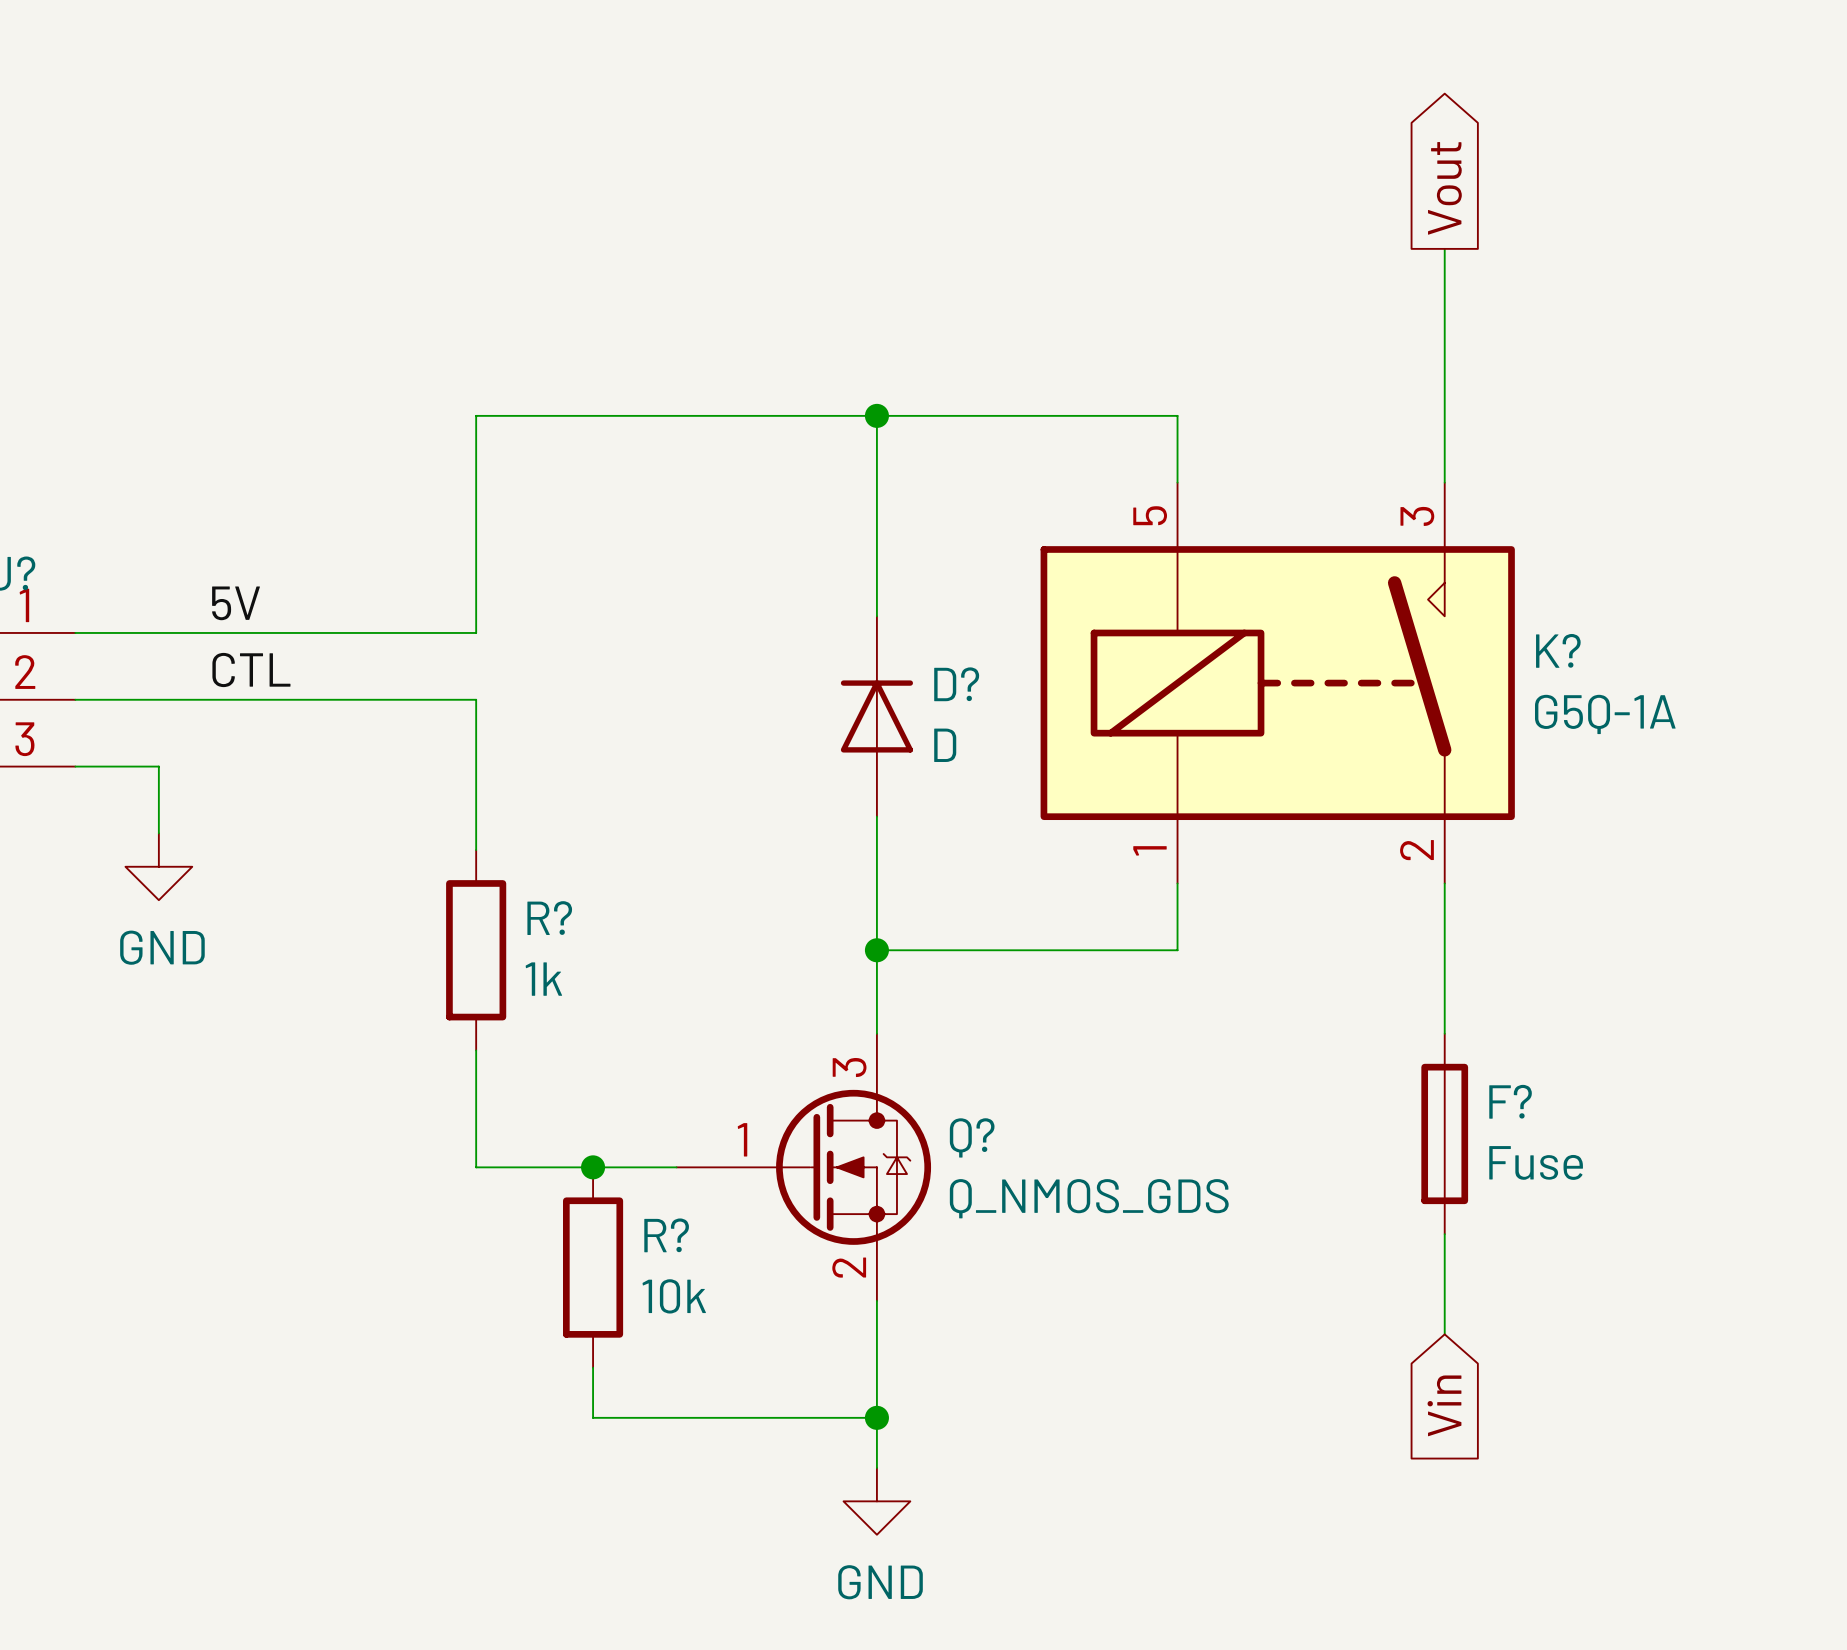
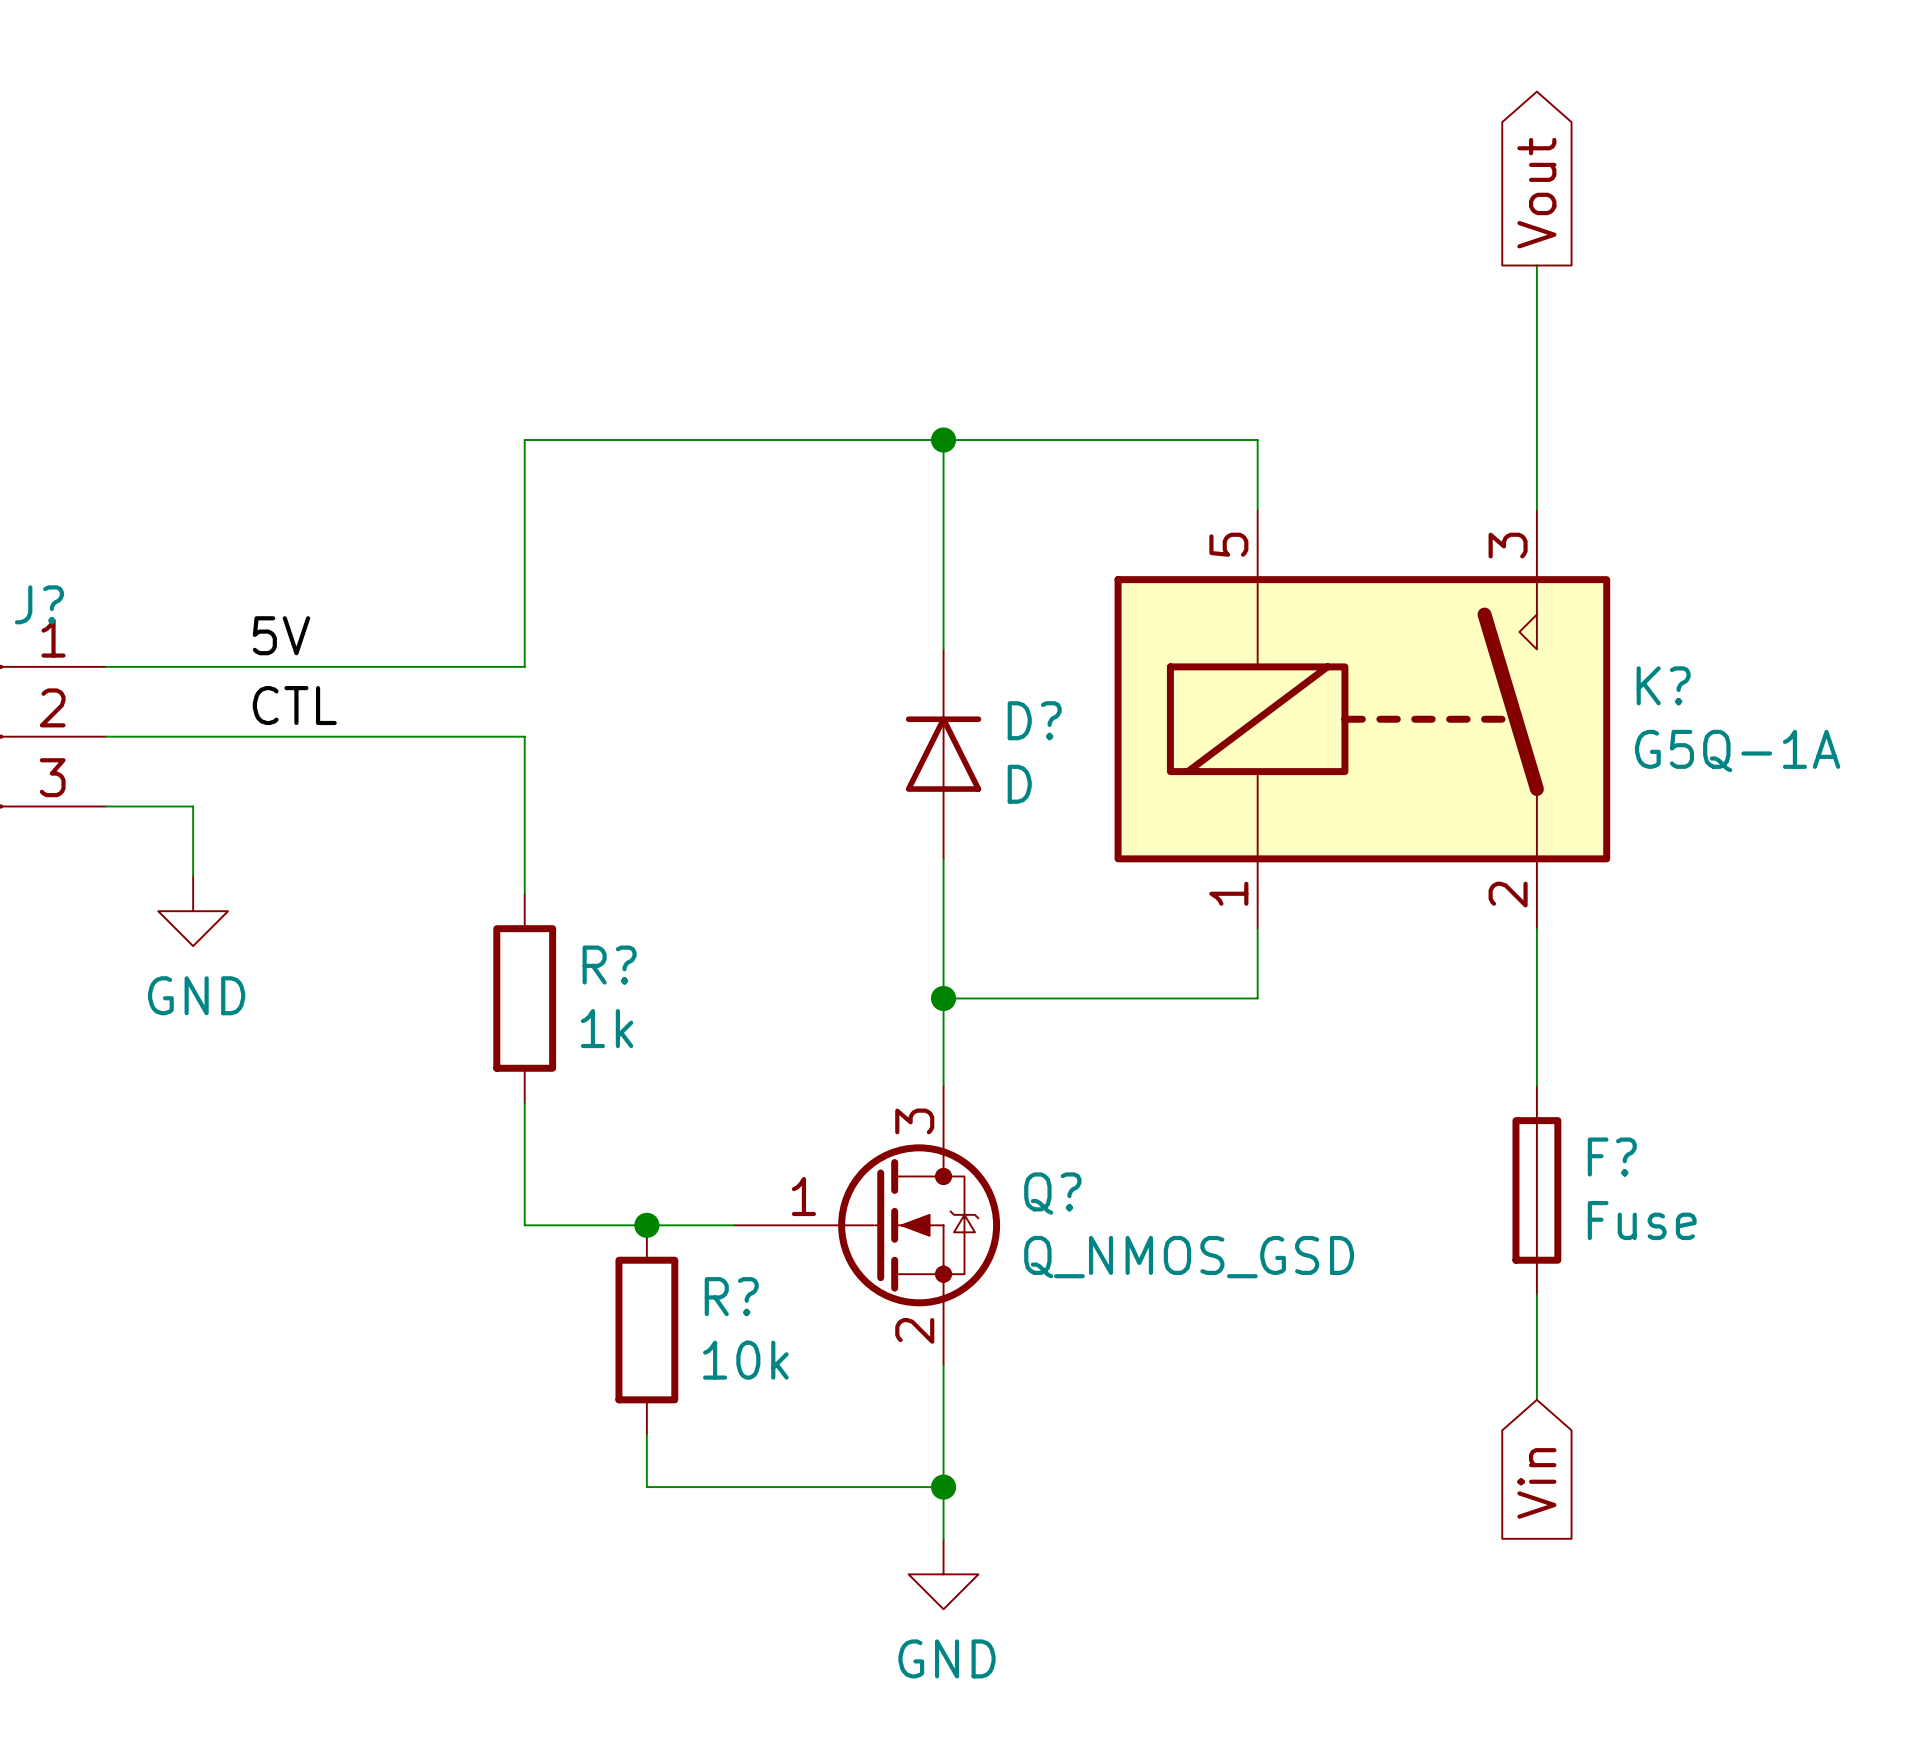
Q? value: Q_NMOS_GDS (1089, 1198) -> Q_NMOS_GSD (1189, 1257)

